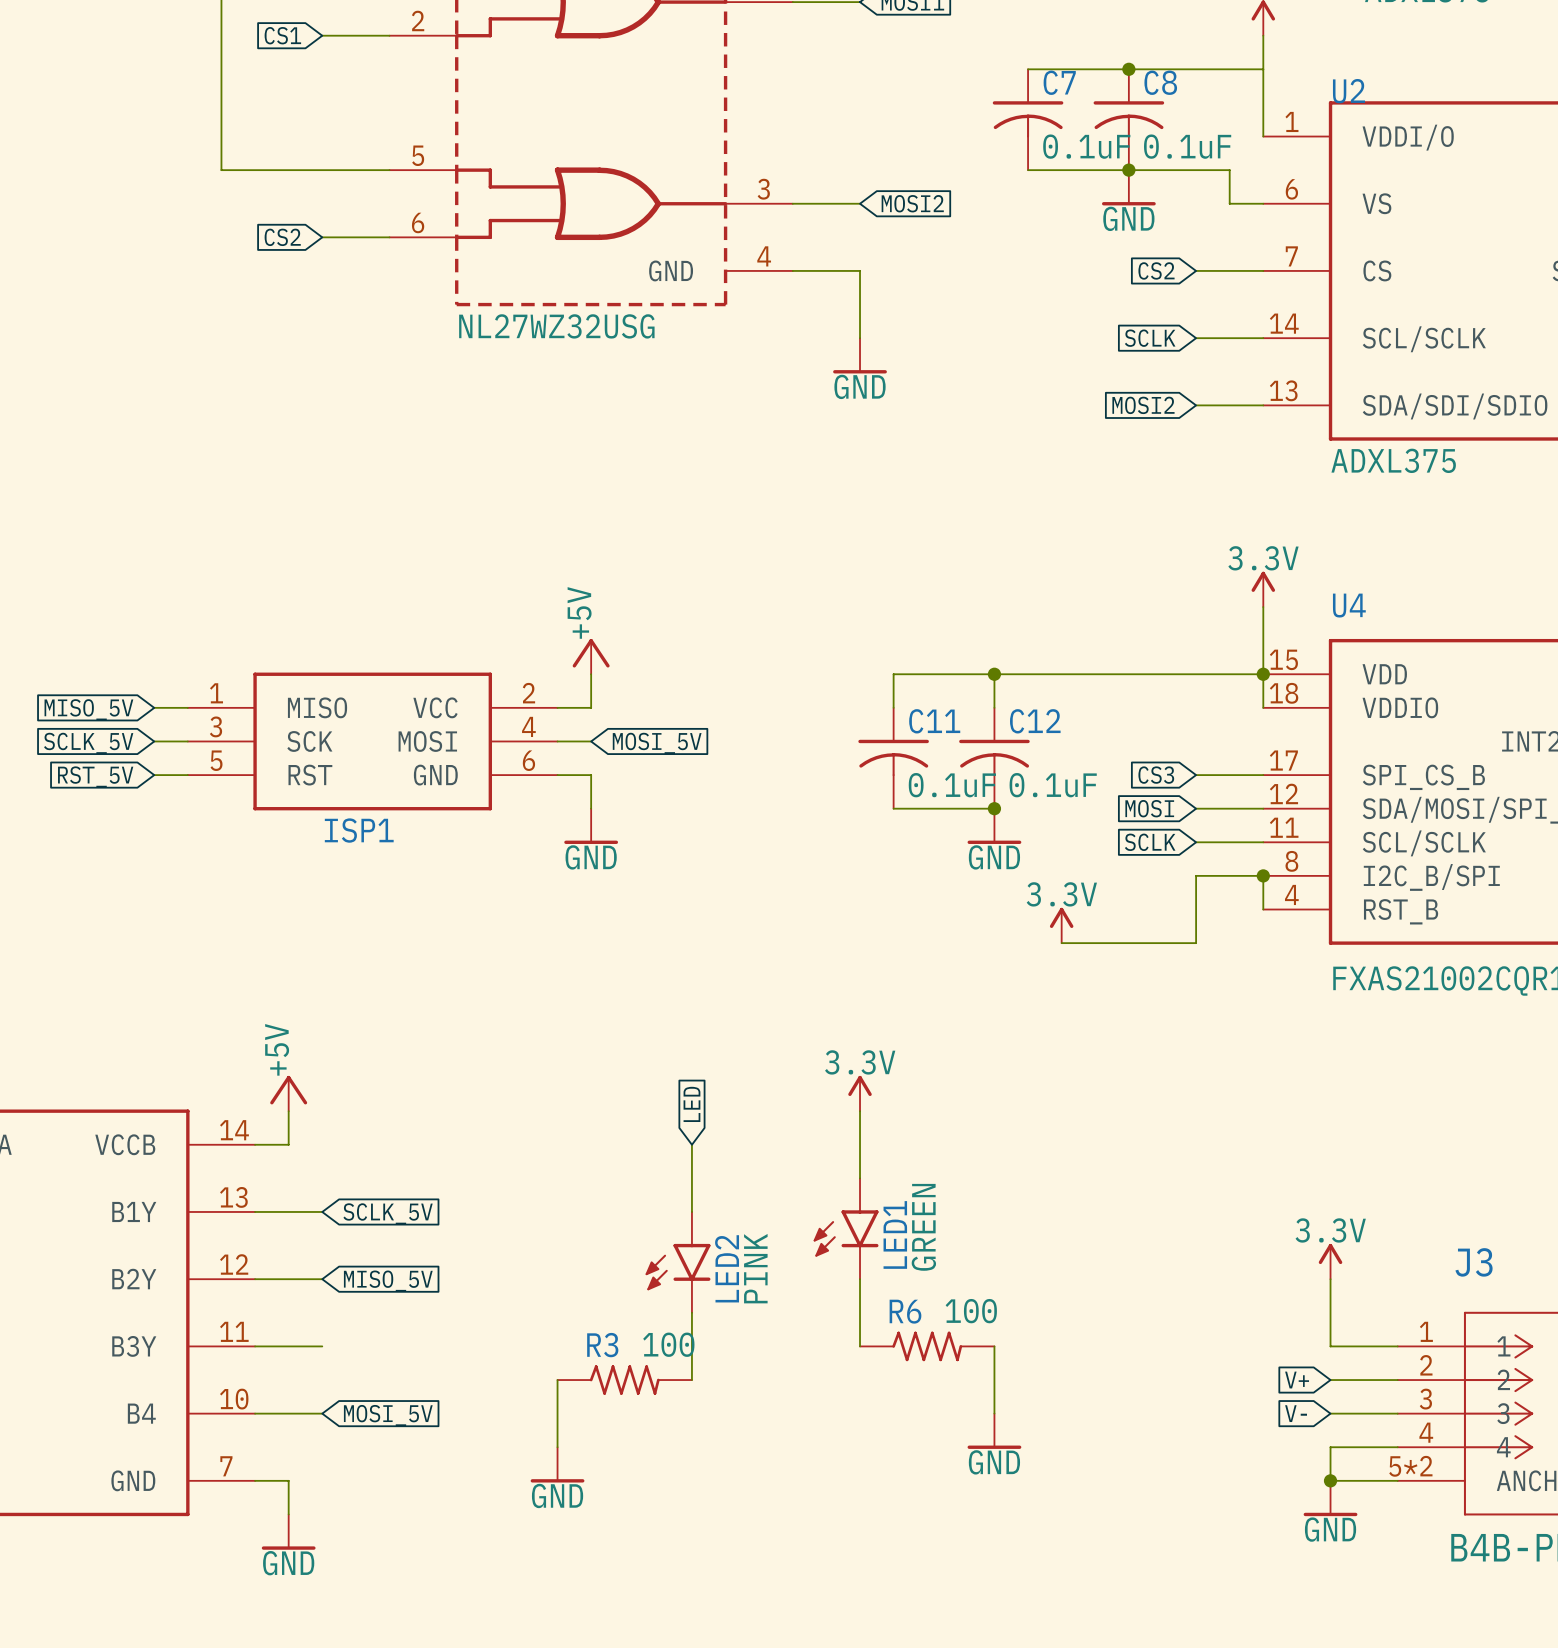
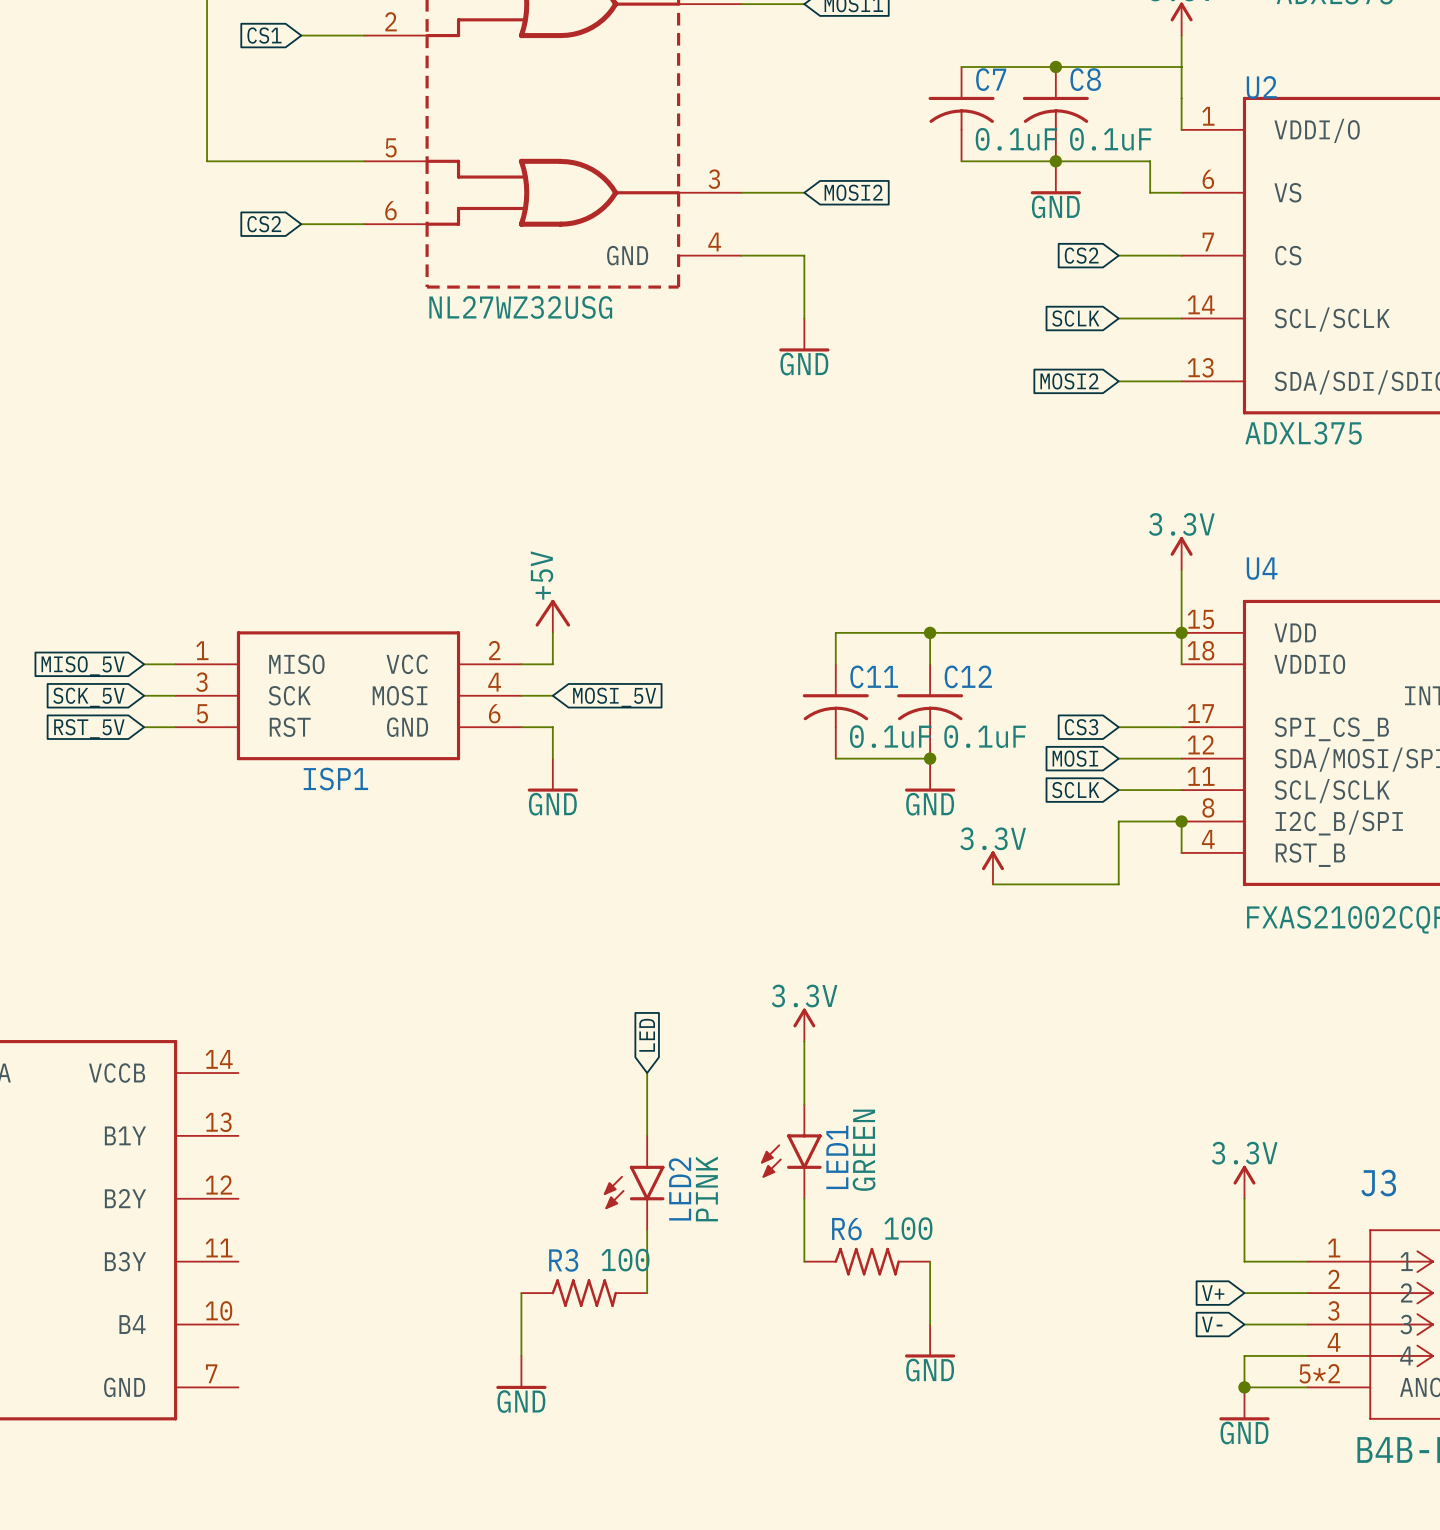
global label: SCLK_5V (88, 743) -> SCK_5V (88, 697)
power symbol: +5V (288, 1093) -> none
wire: (288, 1111) (288, 1144) (255, 1144) -> none
wire: (255, 1211) (322, 1211) -> none
global label: SCLK_5V (388, 1213) -> none
wire: (255, 1279) (322, 1279) -> none
global label: MISO_5V (388, 1281) -> none
wire: (255, 1346) (322, 1346) -> none
wire: (255, 1413) (322, 1413) -> none
global label: MOSI_5V (388, 1415) -> none
wire: (255, 1480) (288, 1480) (288, 1514) -> none
power symbol: GND (288, 1532) -> none

